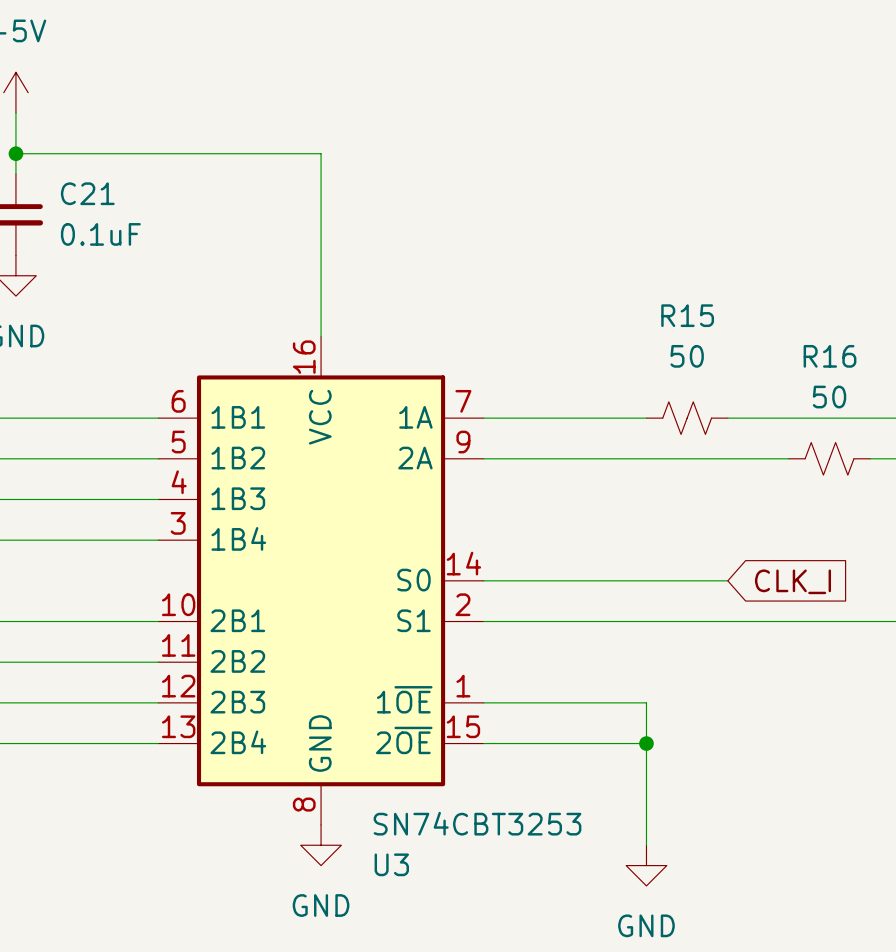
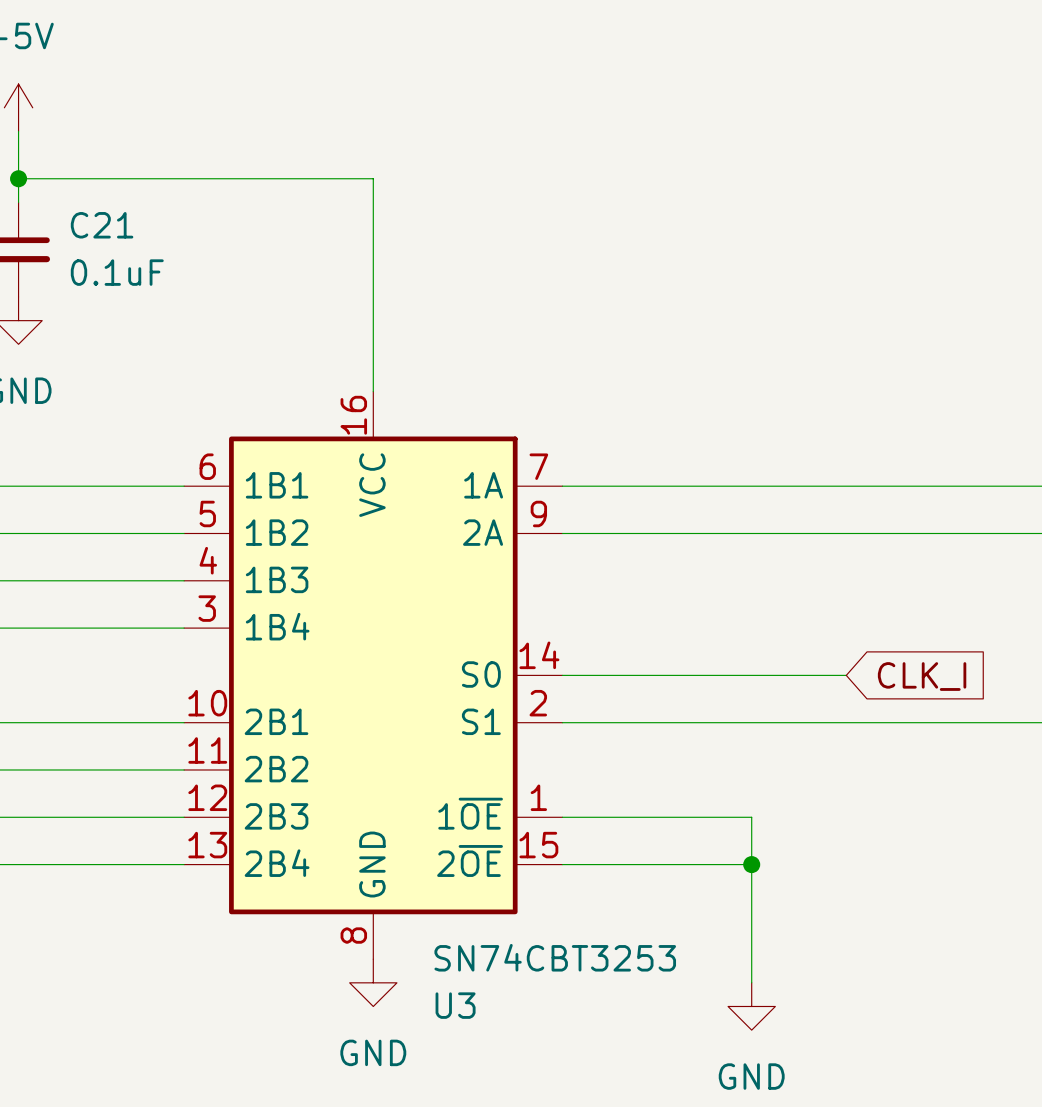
wire: none -> (751, 486) (846, 486)
R15: 50 (687, 418) -> none
wire: none -> (917, 533) (1011, 533)
R16: 50 (829, 458) -> none

